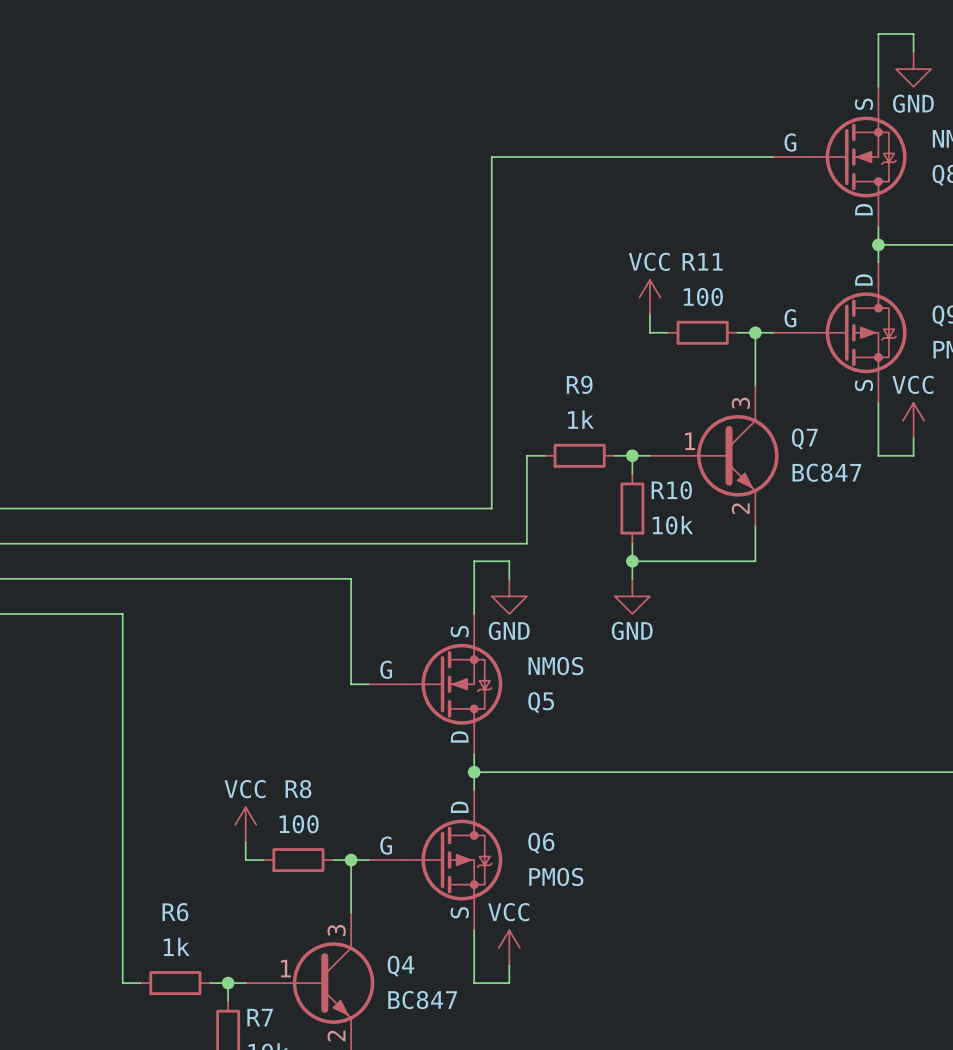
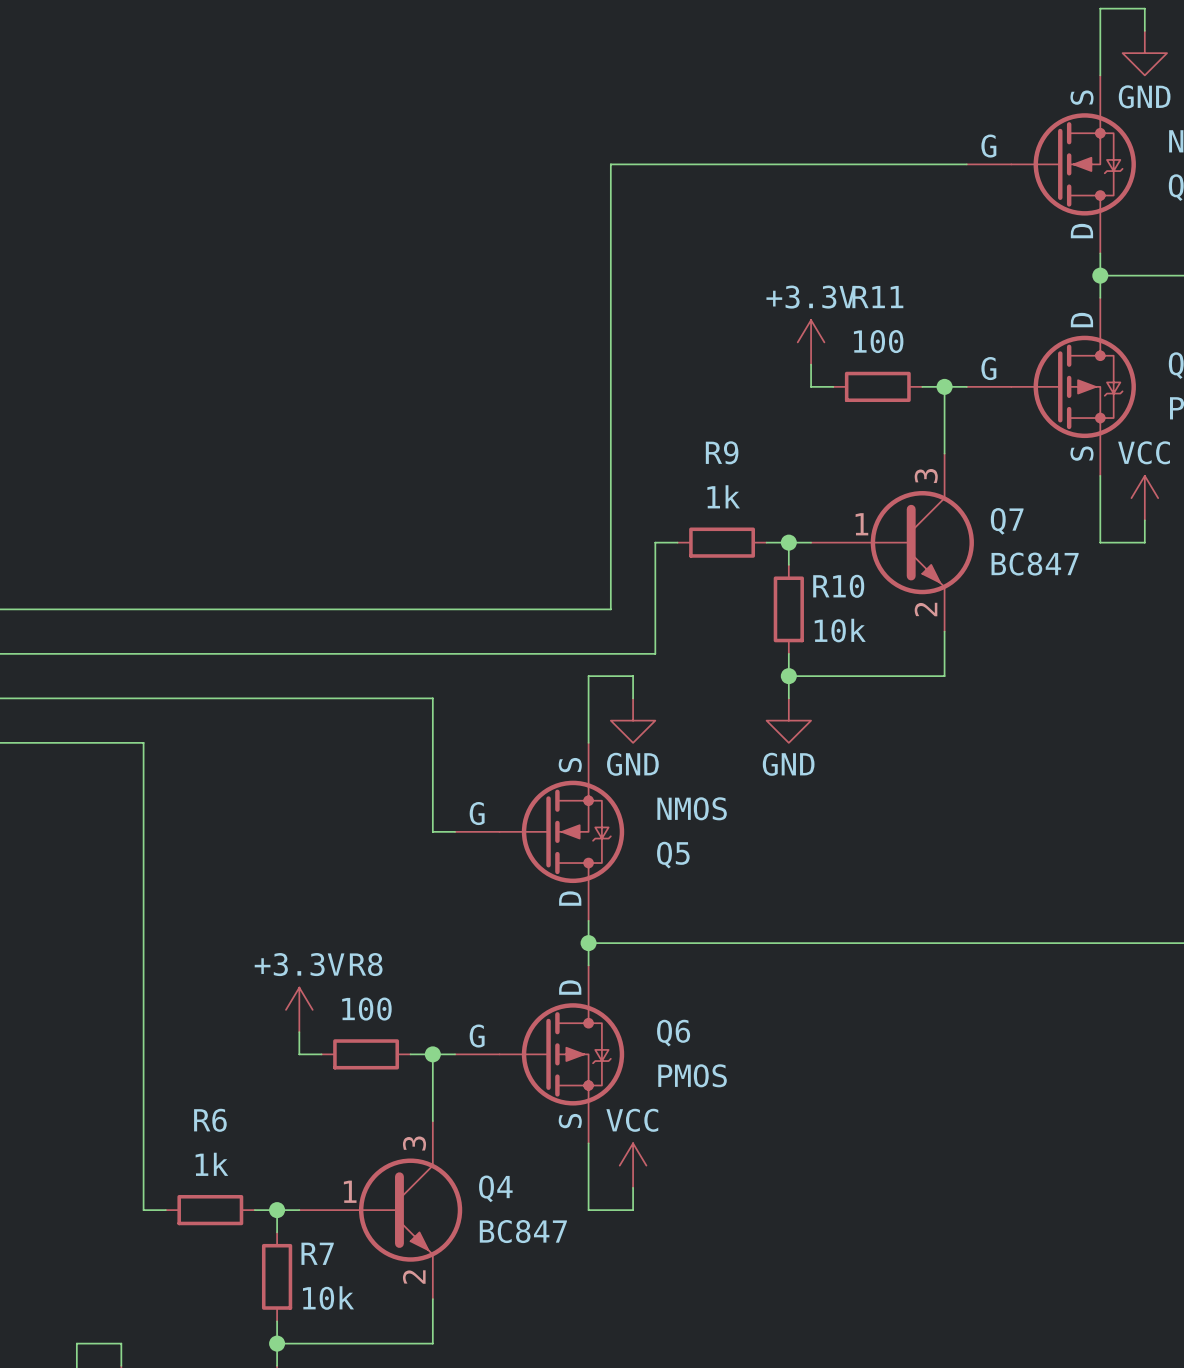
power symbol: VCC (649, 297) -> +3.3V (811, 342)
power symbol: VCC (245, 824) -> +3.3V (299, 1009)

